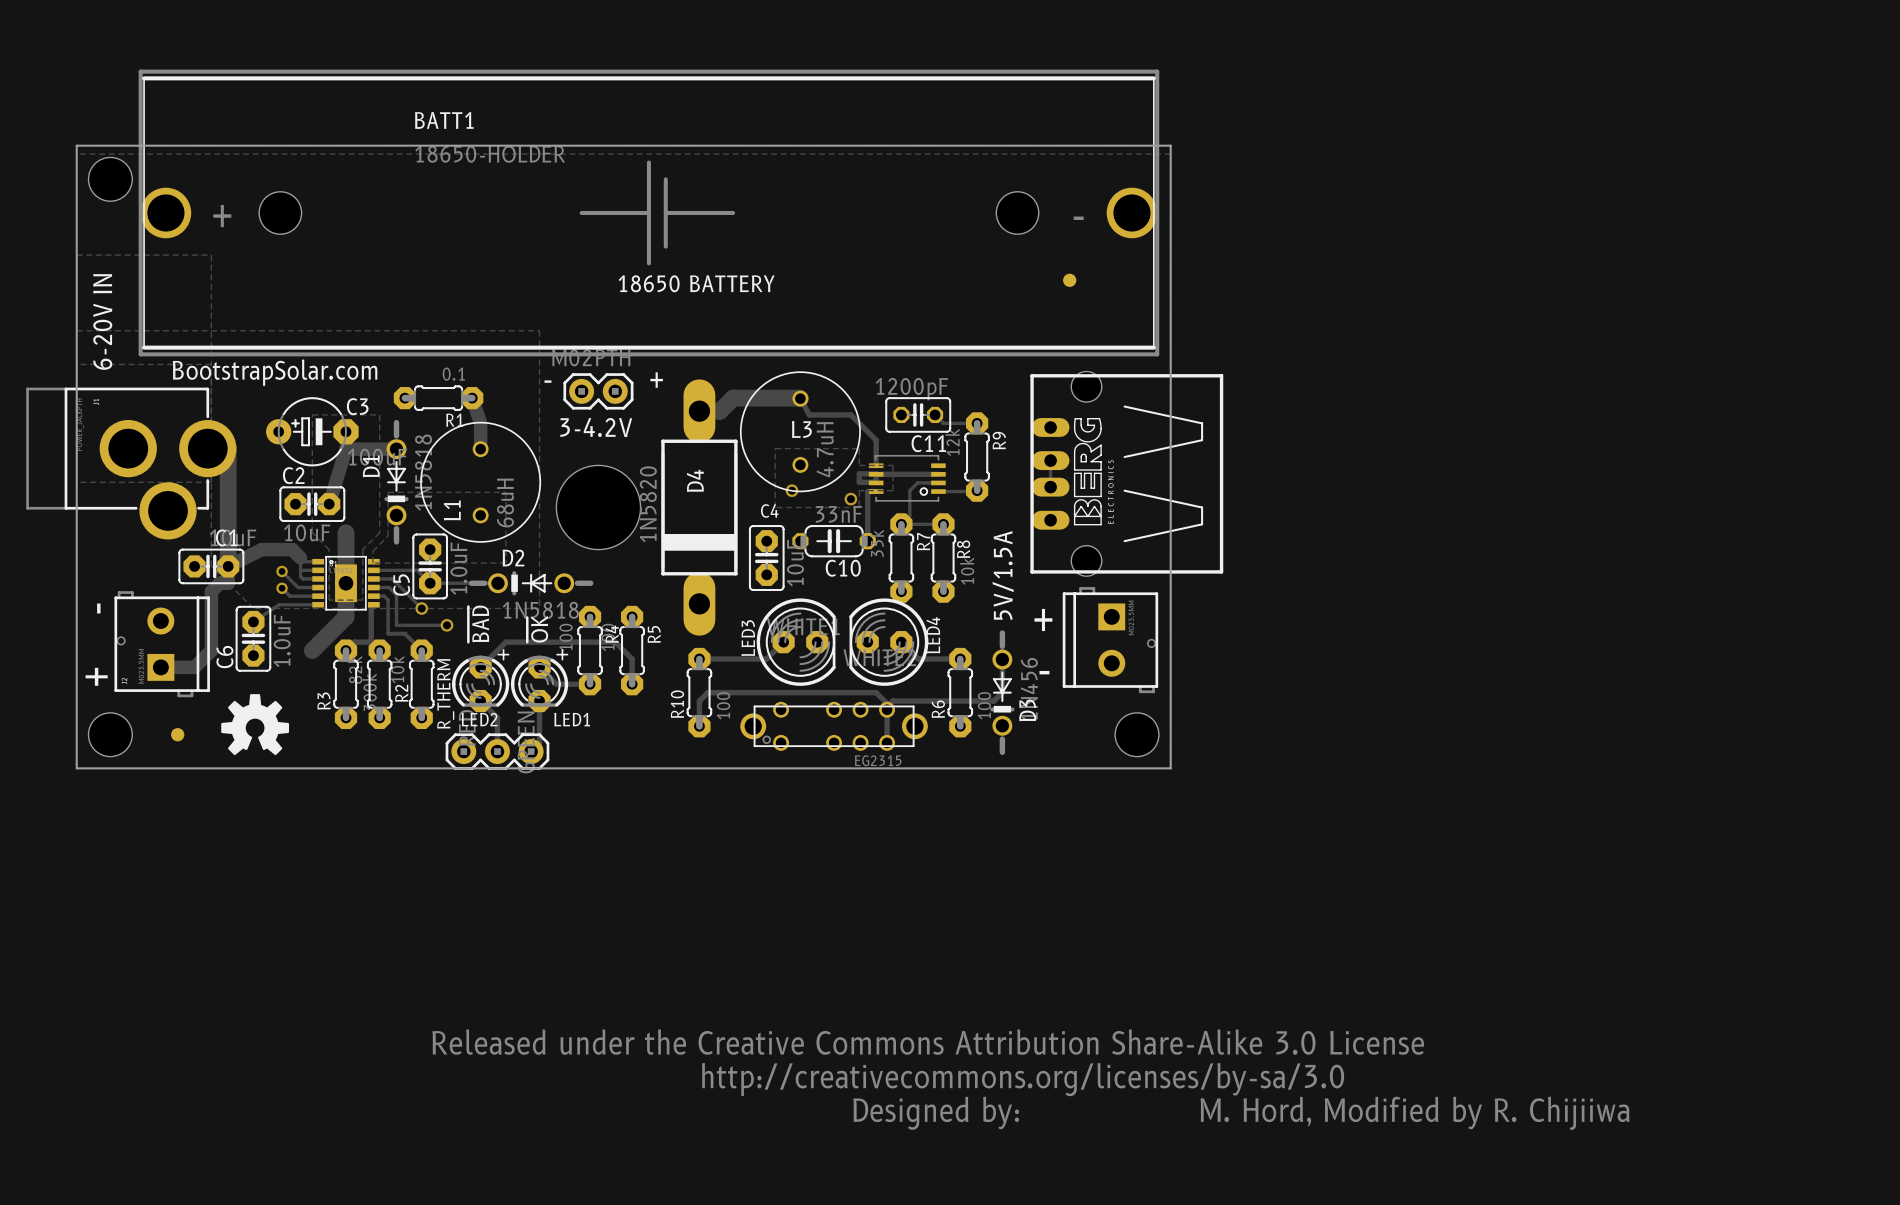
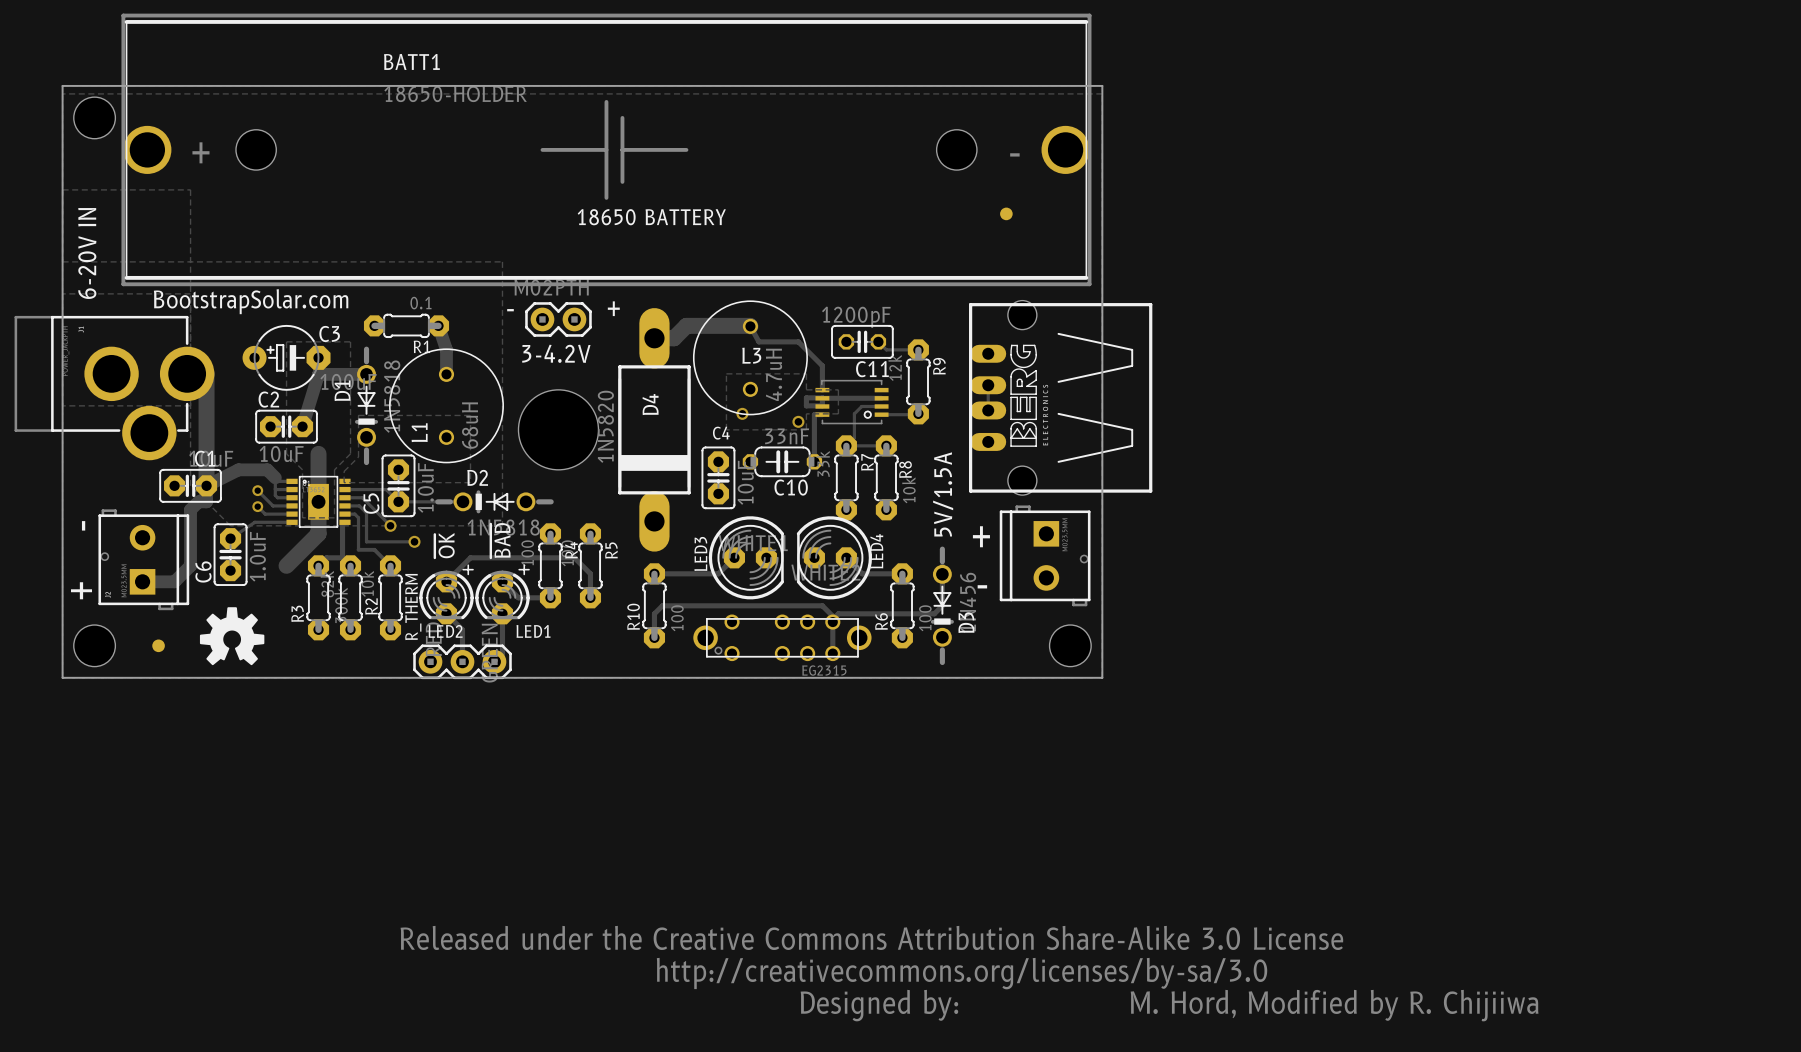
text: ~{BAD} (478, 623) -> ~{OK} (444, 545)
text: ~{OK} (537, 629) -> ~{BAD} (500, 540)

